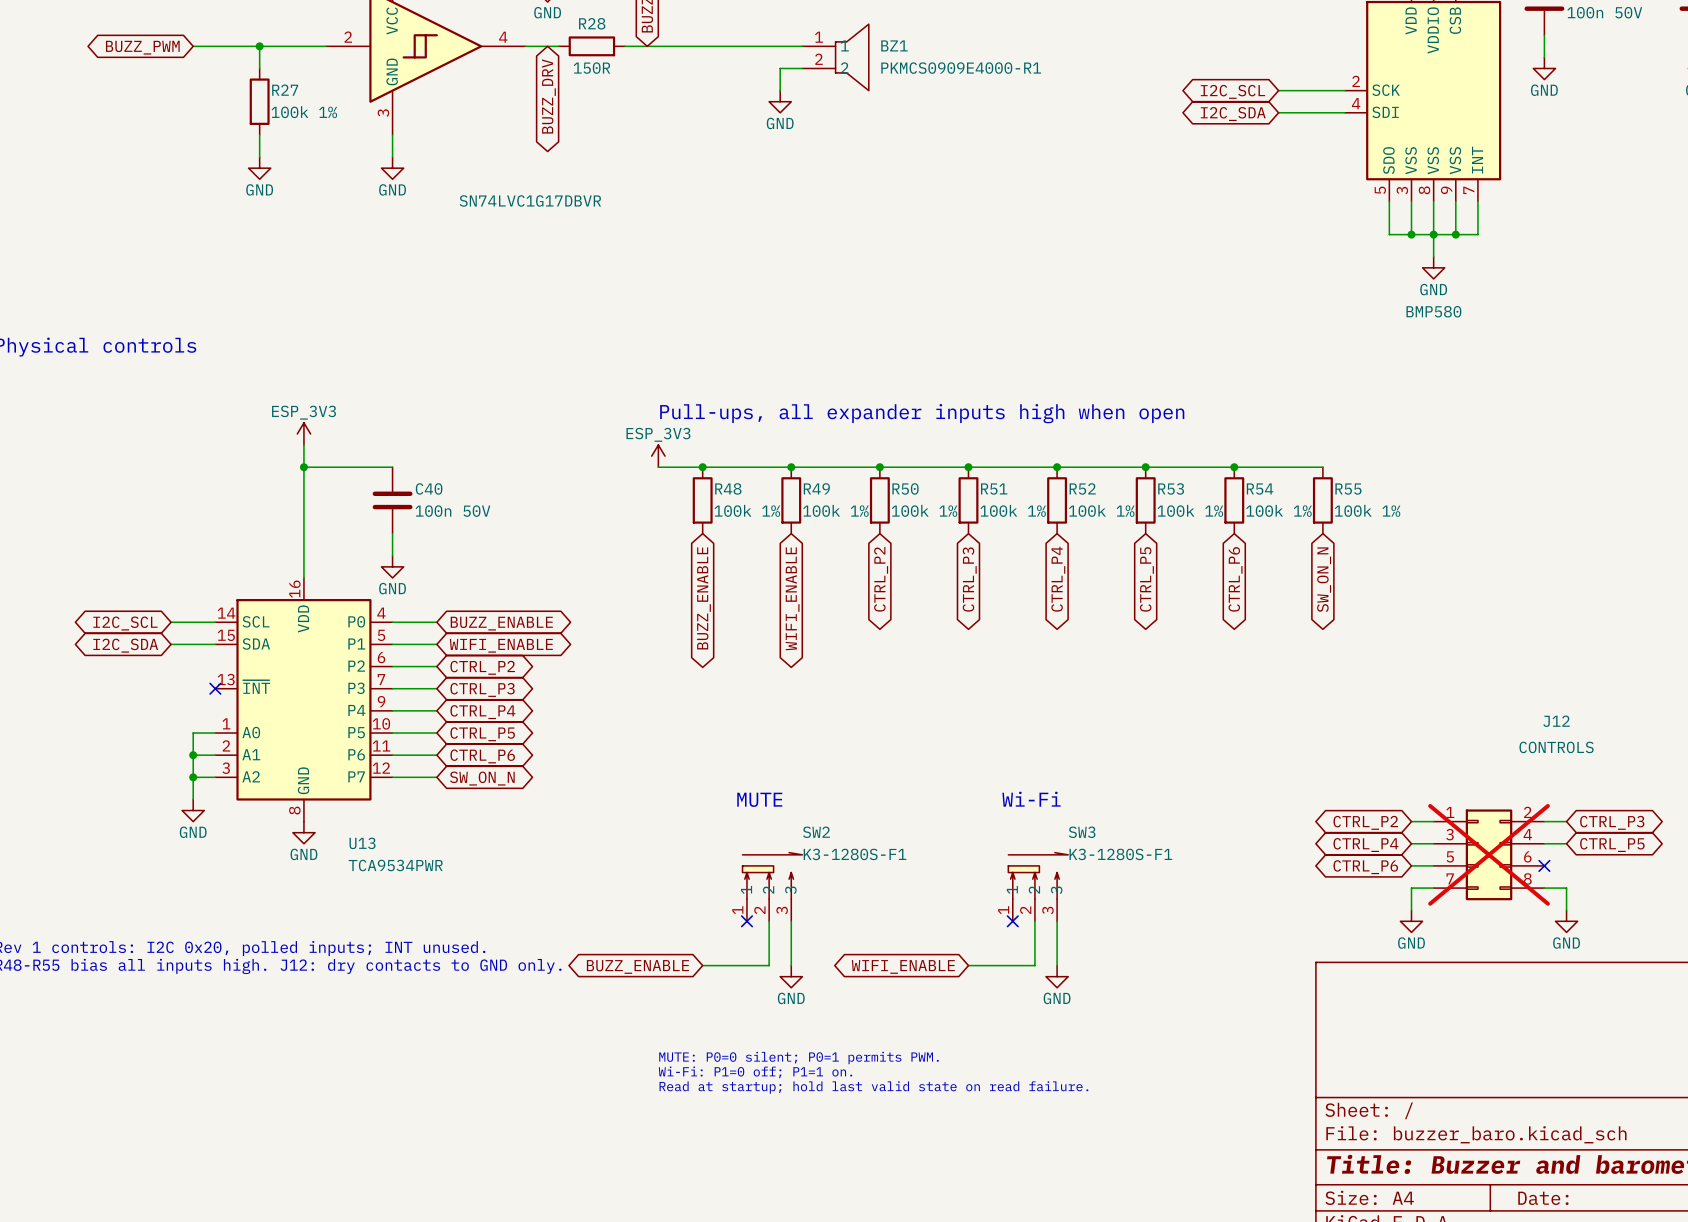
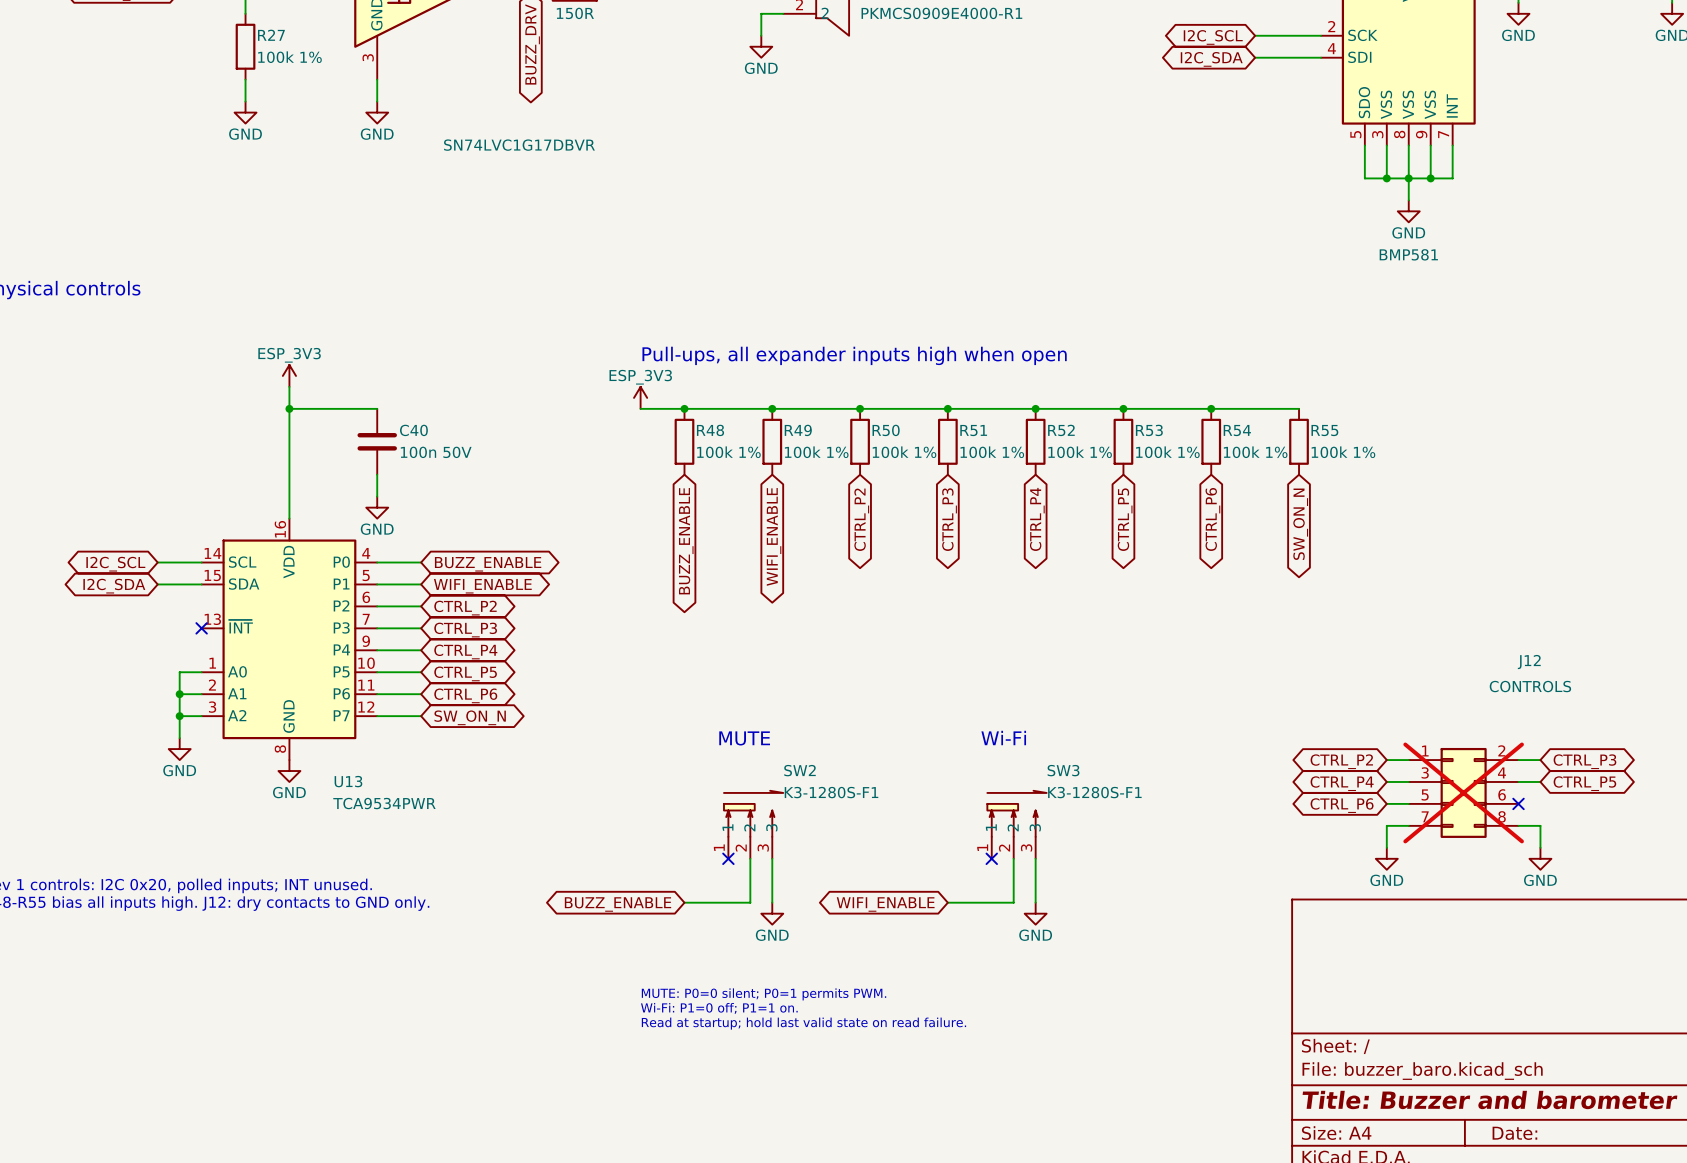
part value: BMP580 (1433, 311) -> BMP581 (1408, 254)

